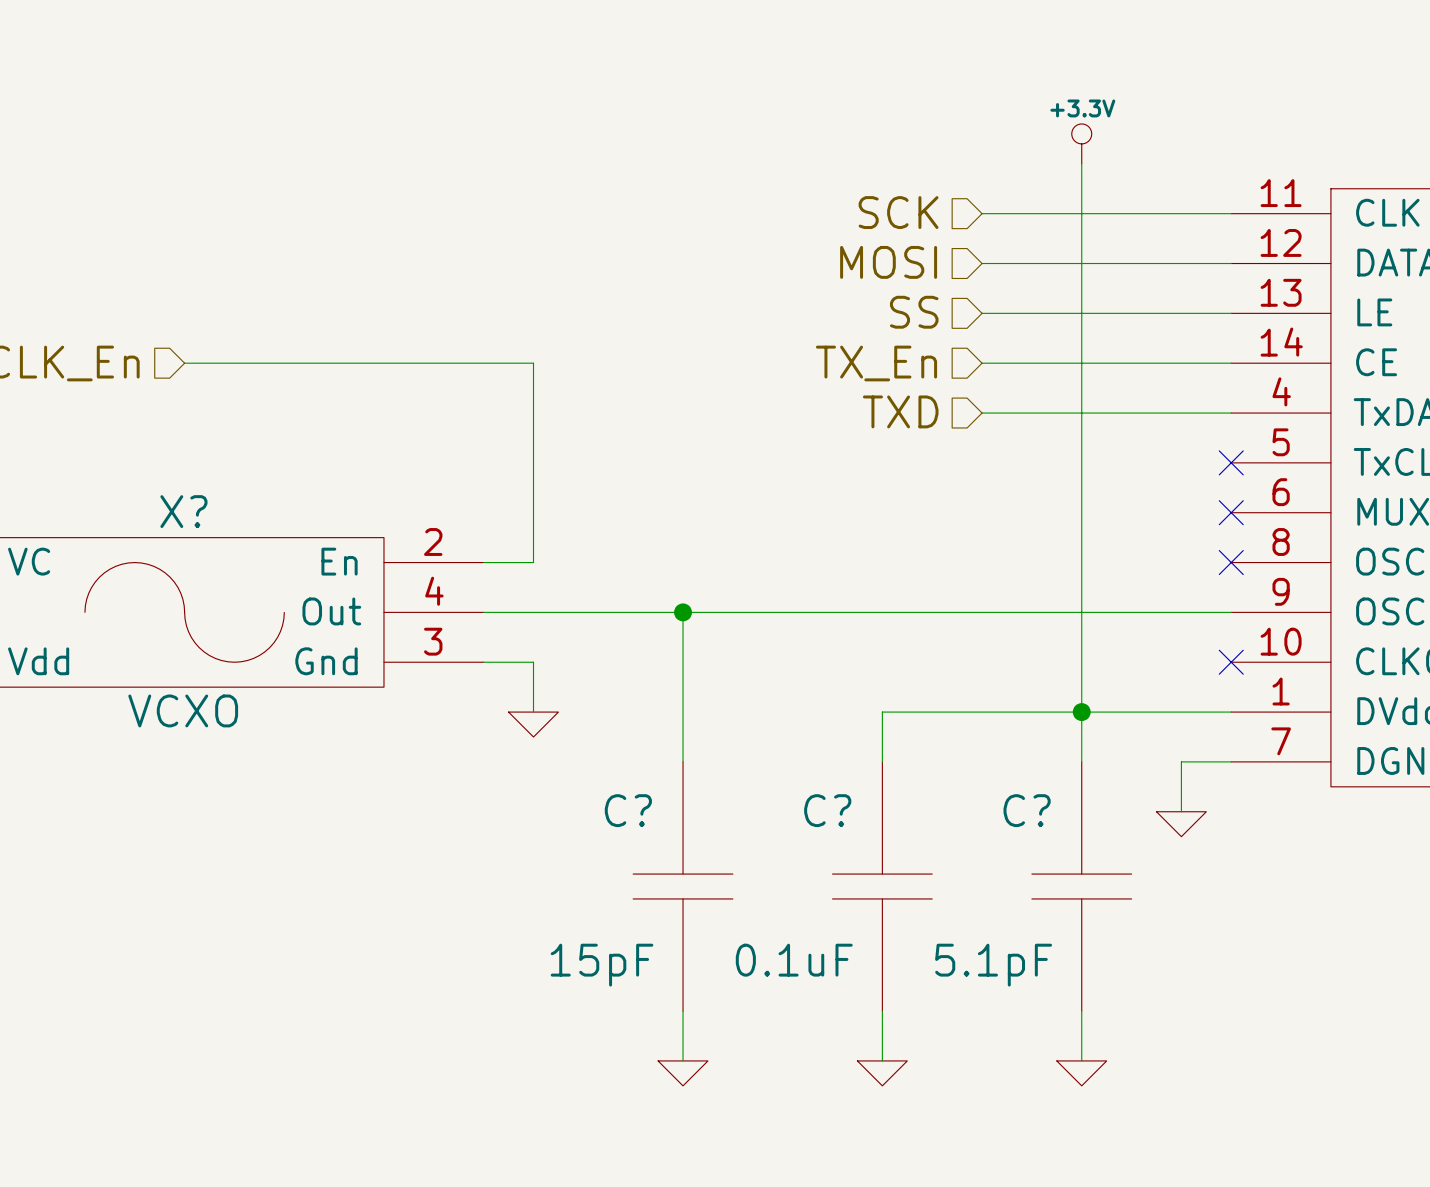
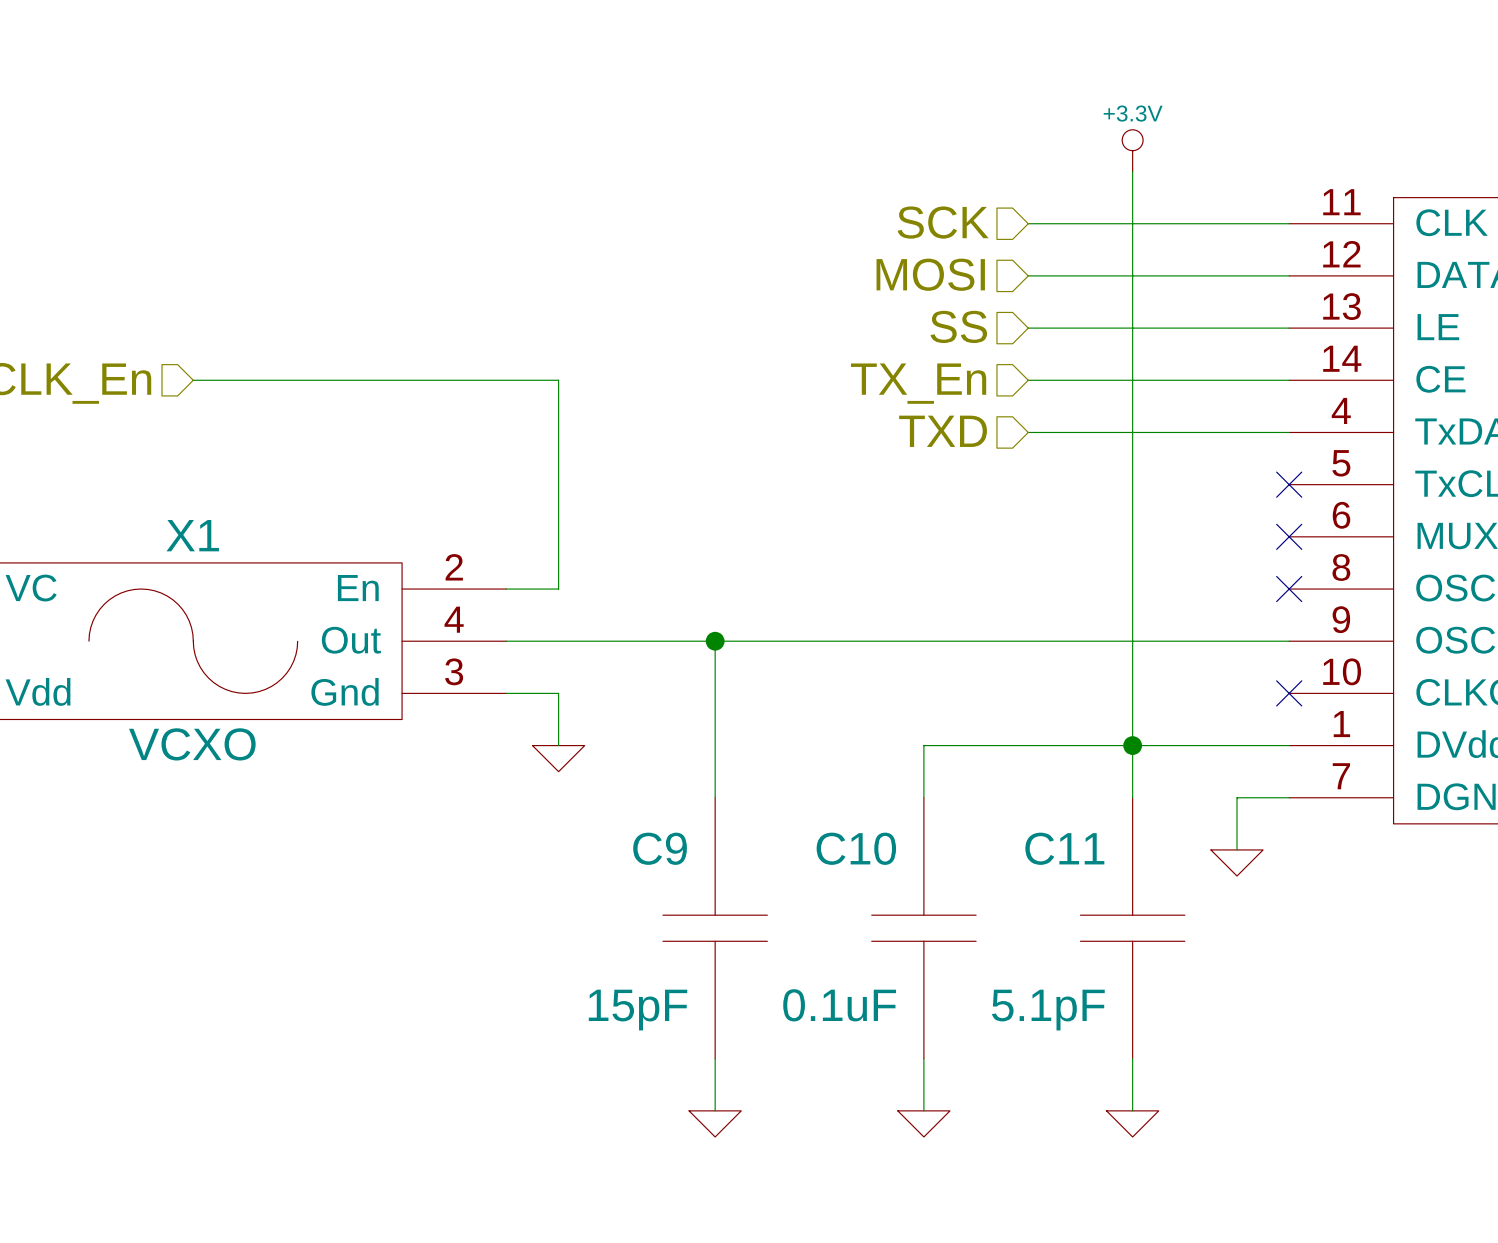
X? name: X? (183, 511) -> X1 (192, 535)
C? name: C? (628, 810) -> C9 (660, 848)
C? name: C? (827, 810) -> C10 (856, 848)
C? name: C? (1027, 810) -> C11 (1064, 848)

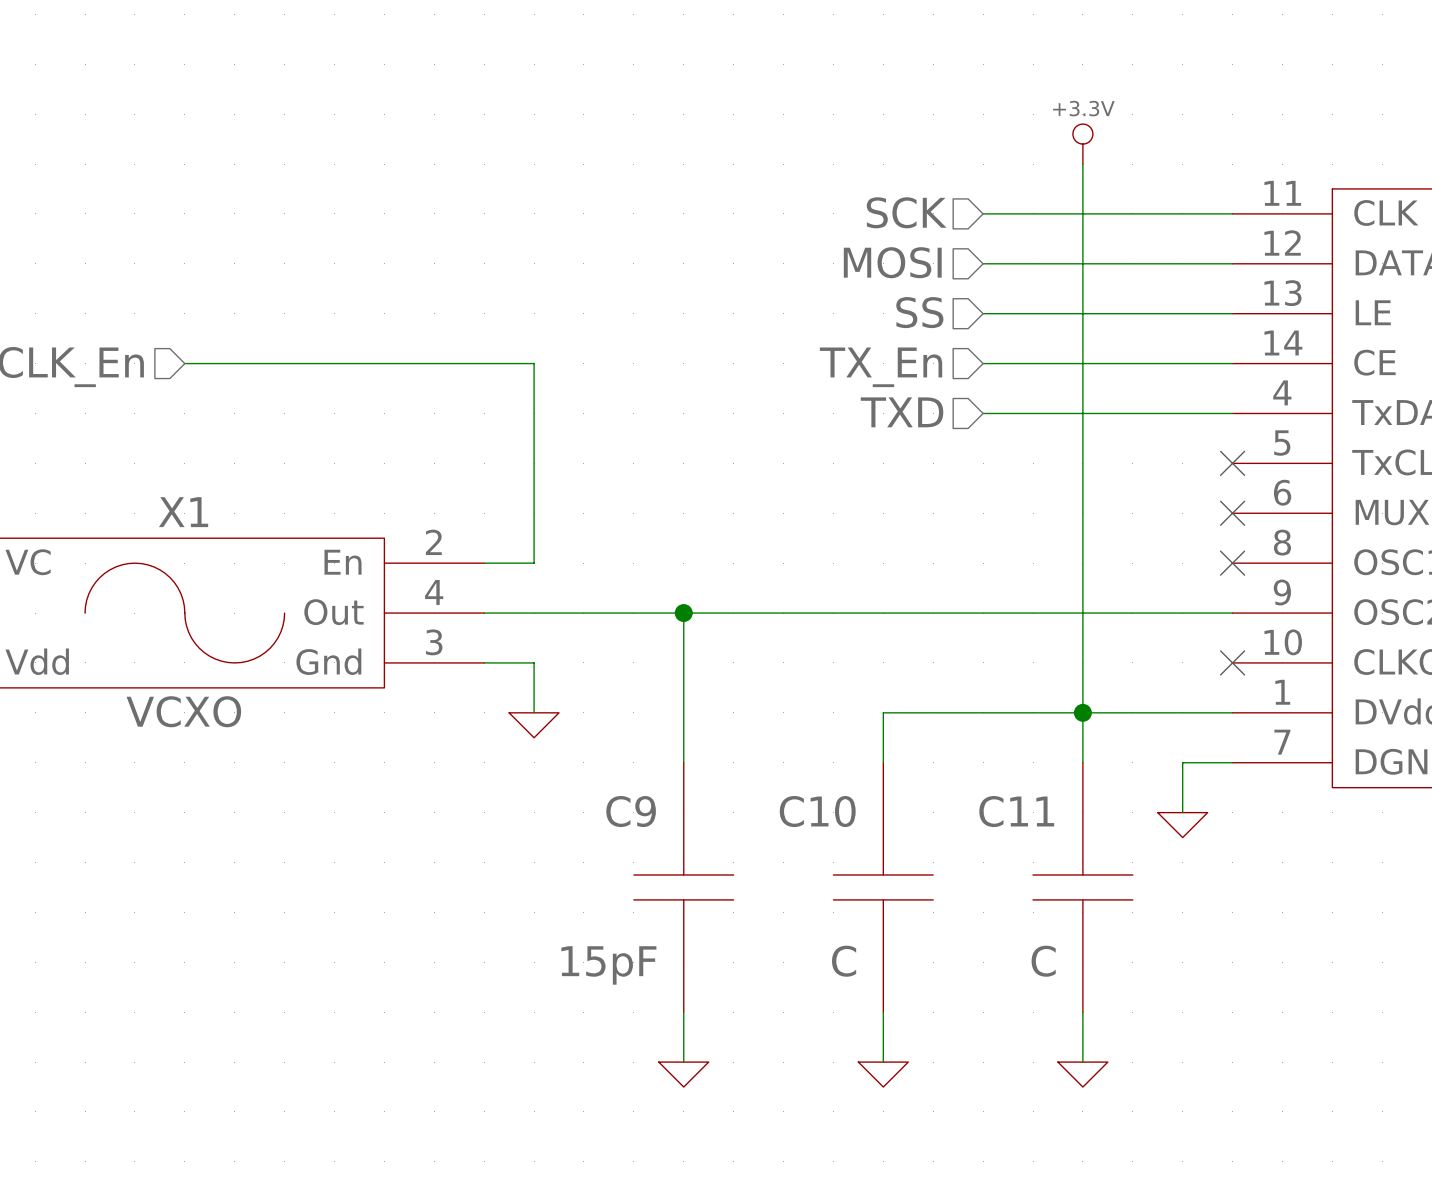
C10 value: 0.1uF (839, 1005) -> C (844, 961)
C11 value: 5.1pF (1048, 1010) -> C (1043, 961)

